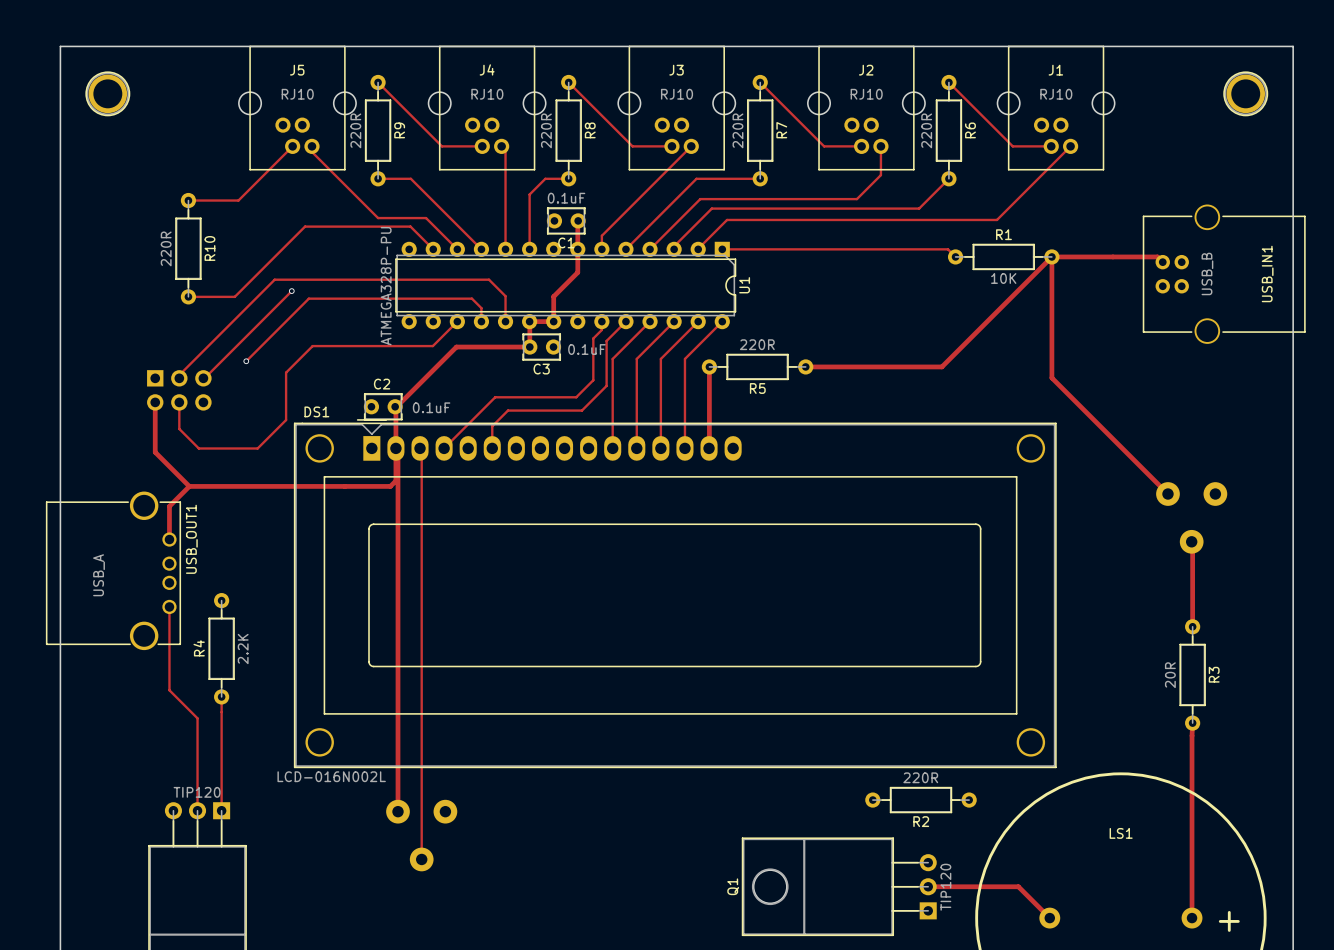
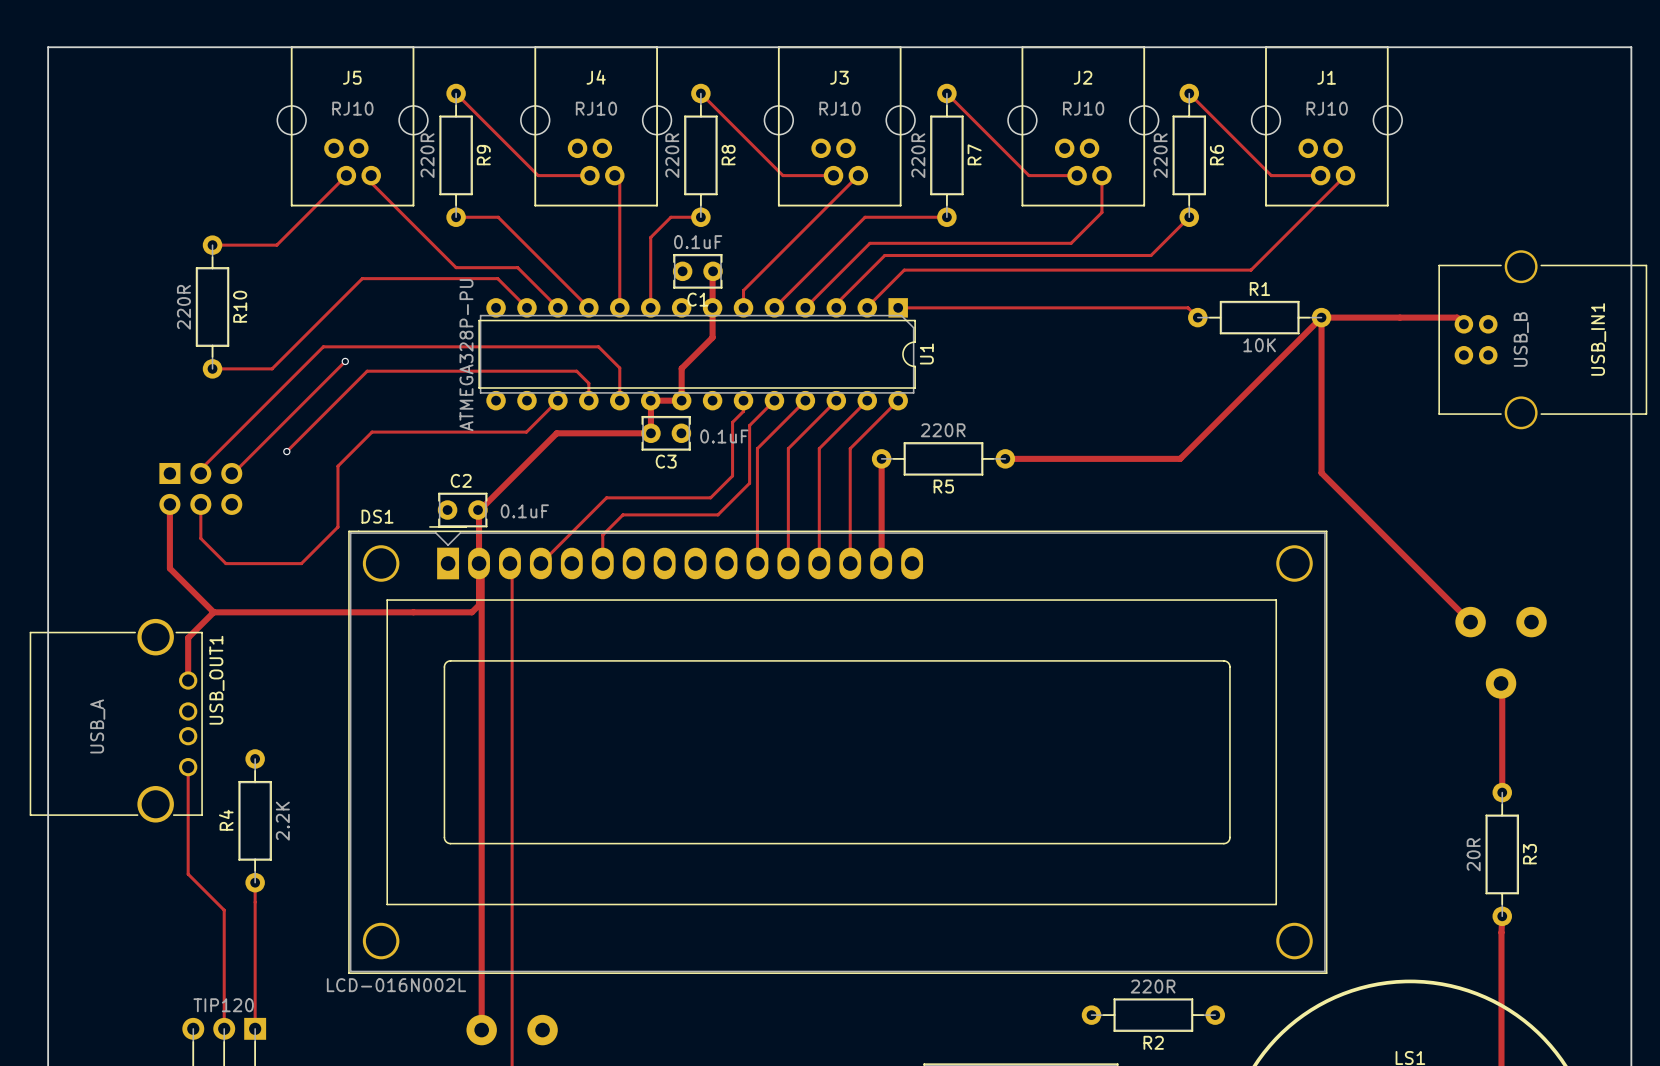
part: (107, 93) -> none
part: (1245, 93) -> none

